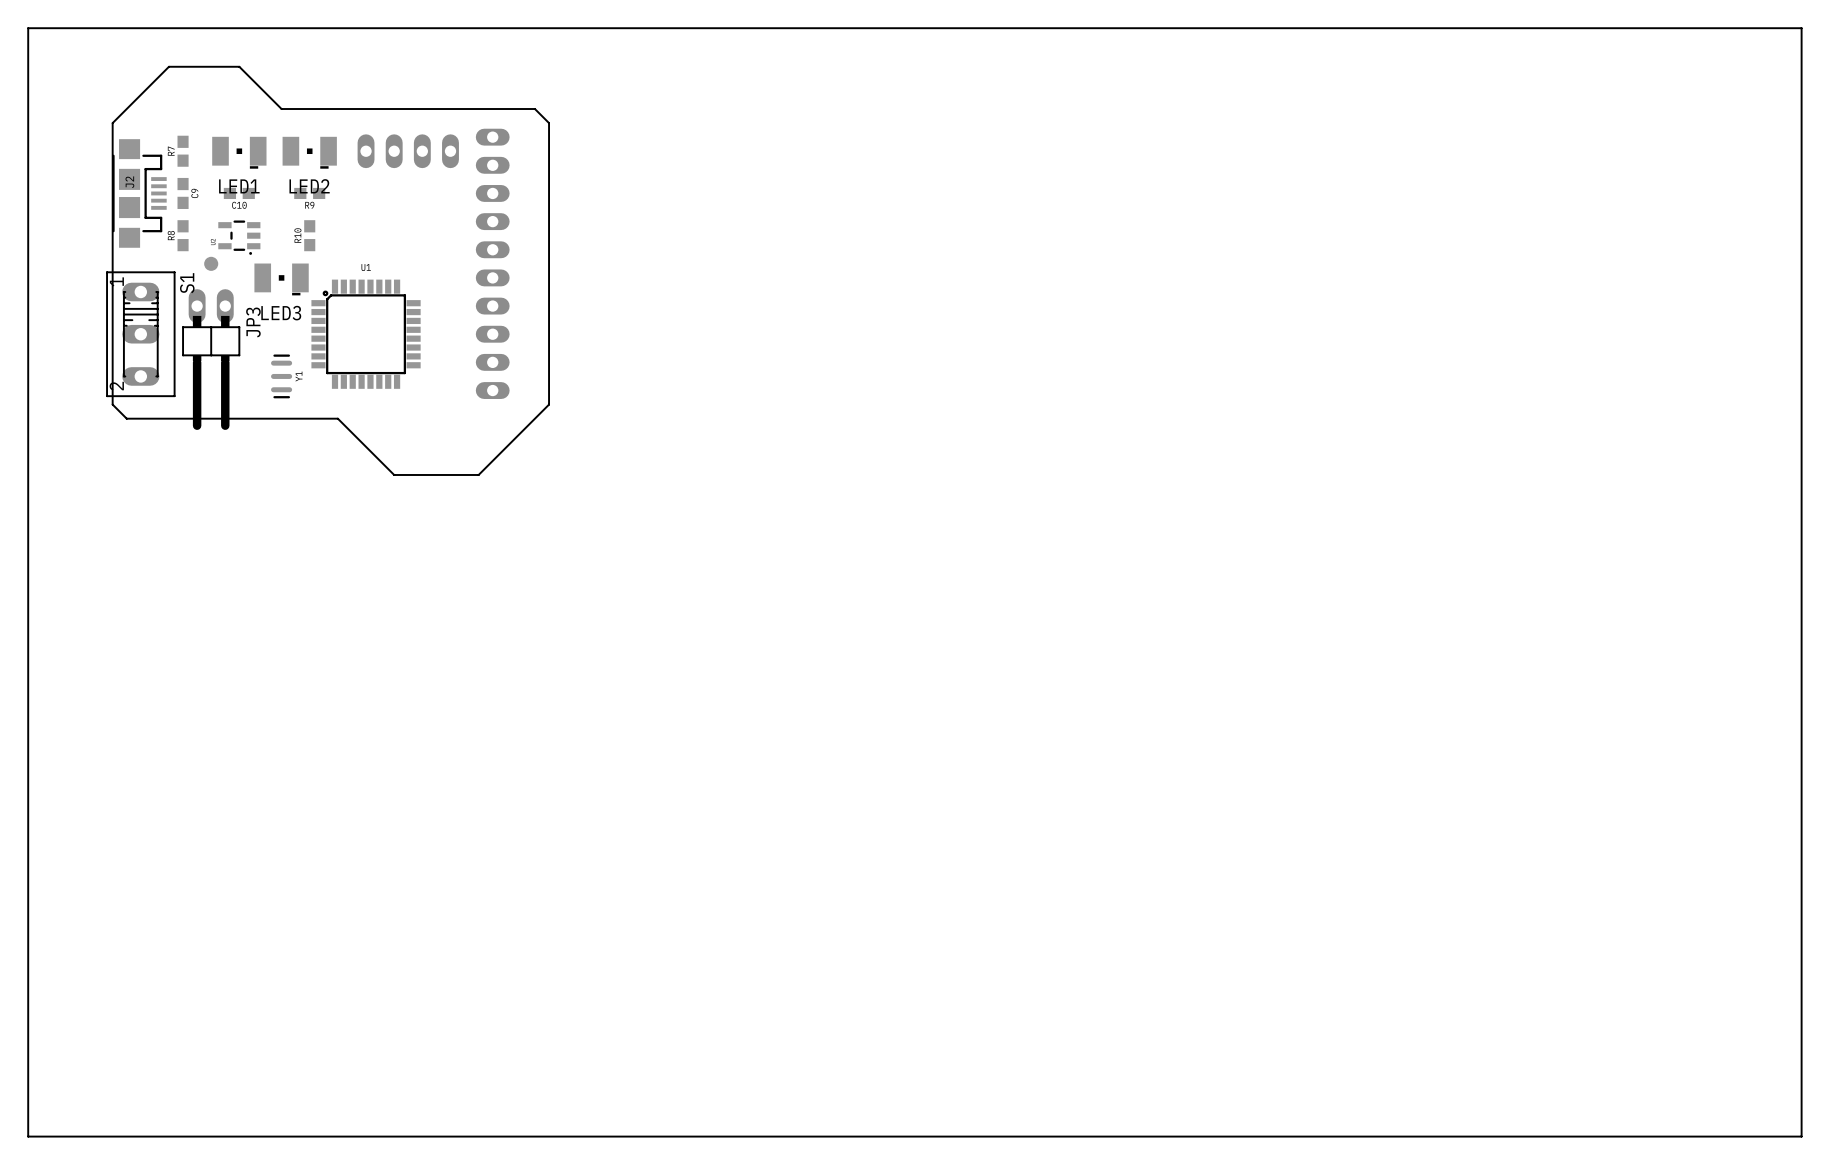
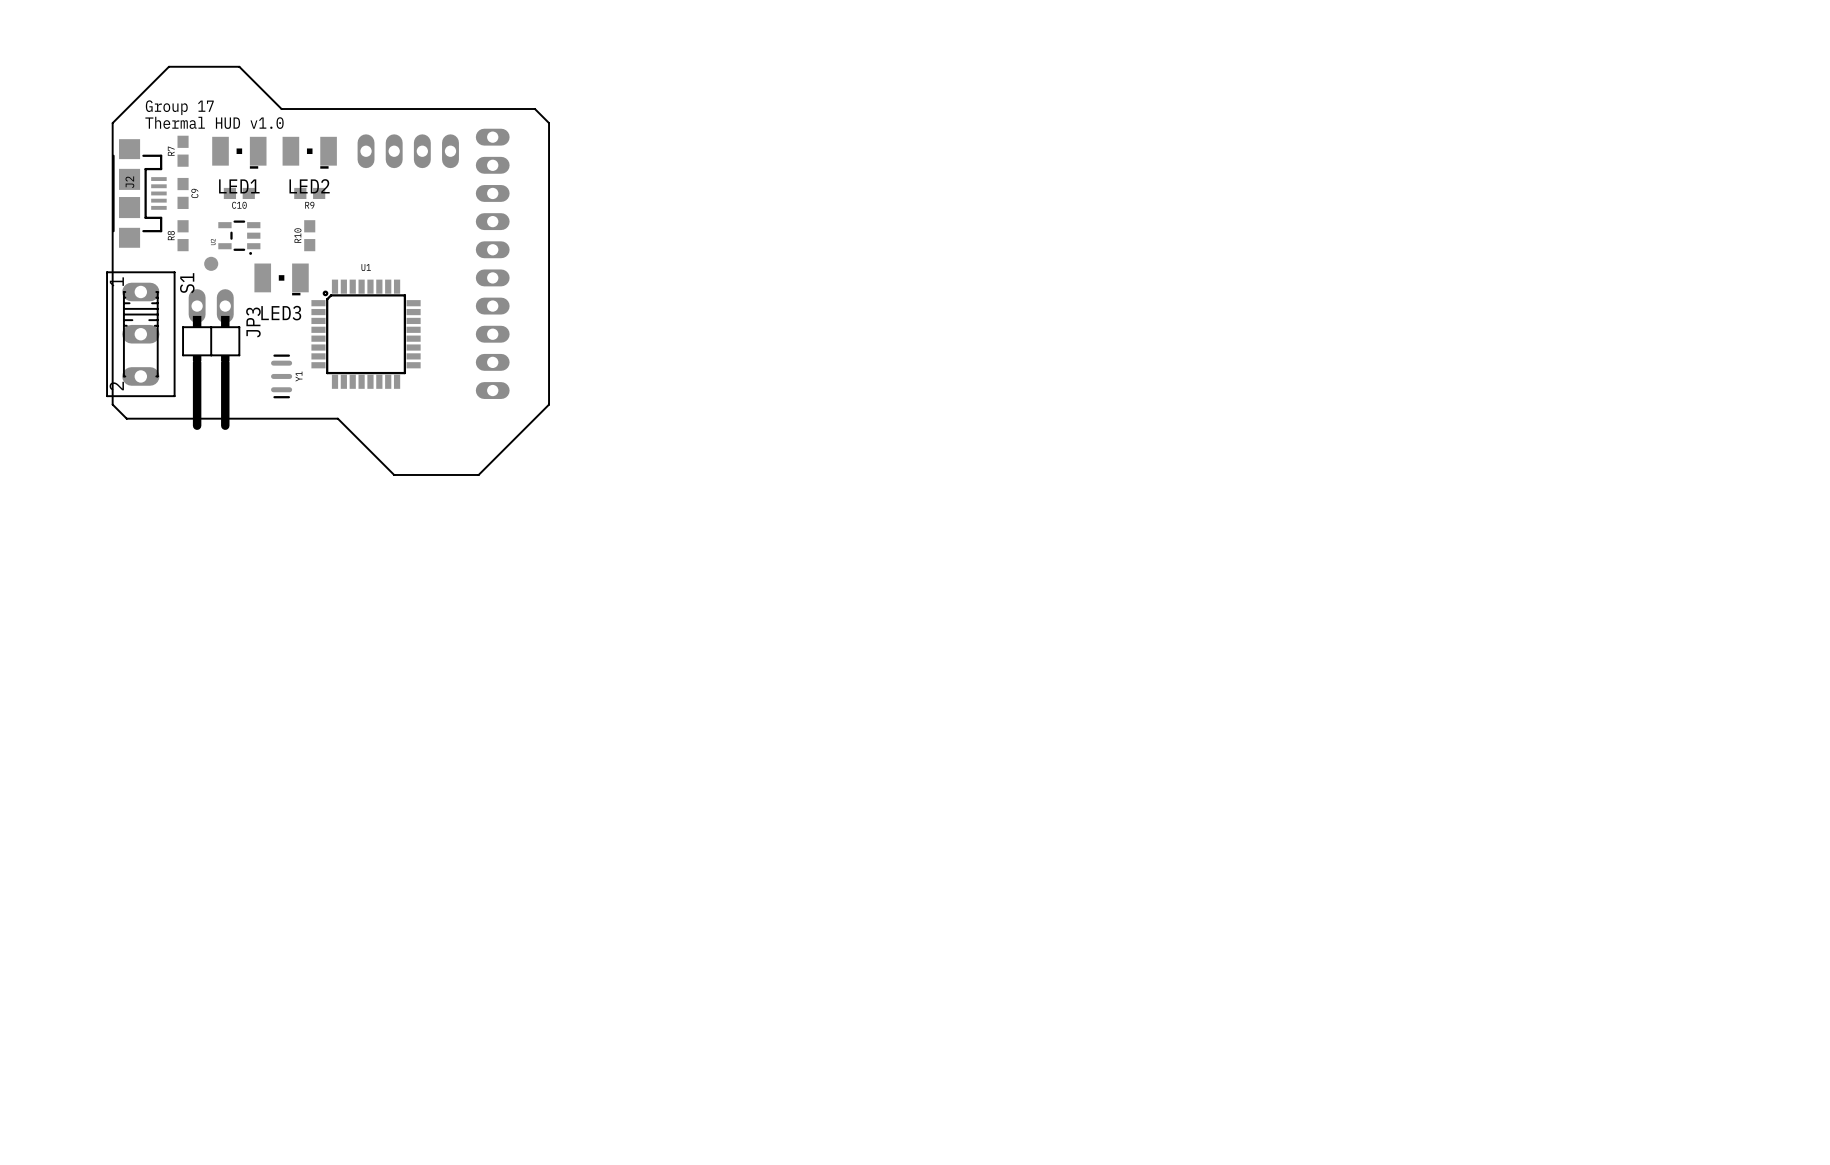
board edge: (28, 28) (1801, 28) (1801, 1136) (28, 1136) (28, 28) -> none
text: none -> Group 17 (179, 107)
text: none -> Thermal HUD v1.0 (214, 122)

